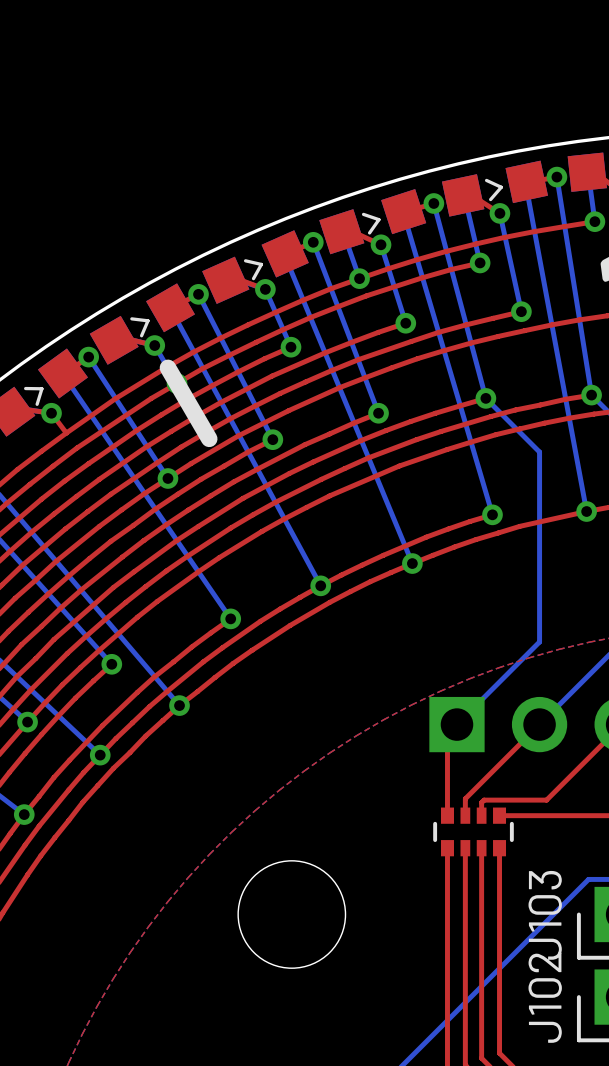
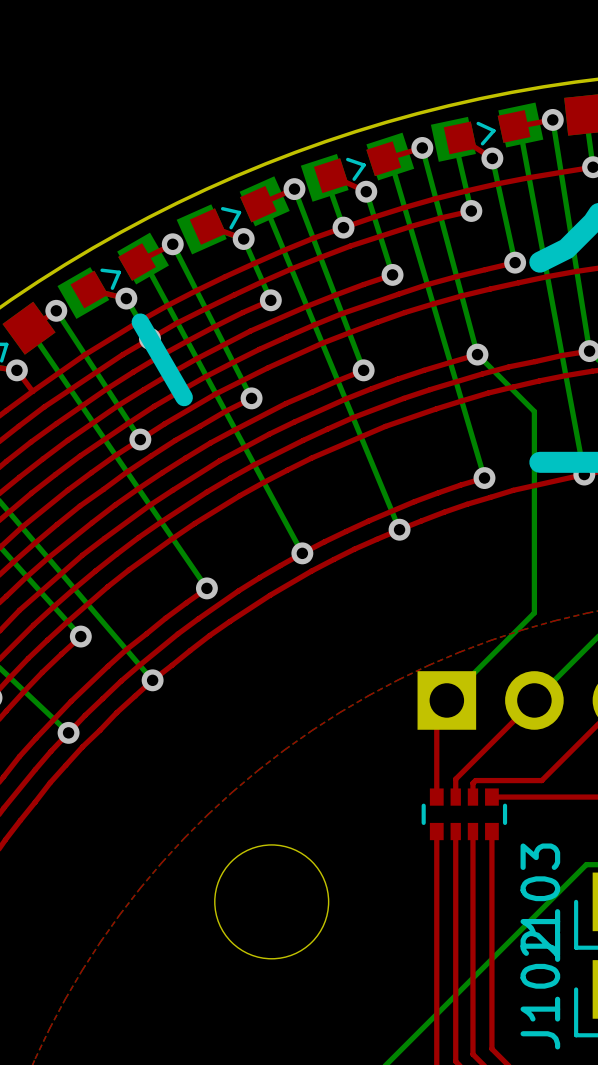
part: (494, 188) -> none
part: none -> (487, 132)
part: (372, 221) -> none
part: none -> (357, 167)
part: (255, 267) -> none
part: none -> (233, 215)
part: (142, 324) -> none
part: none -> (113, 275)

